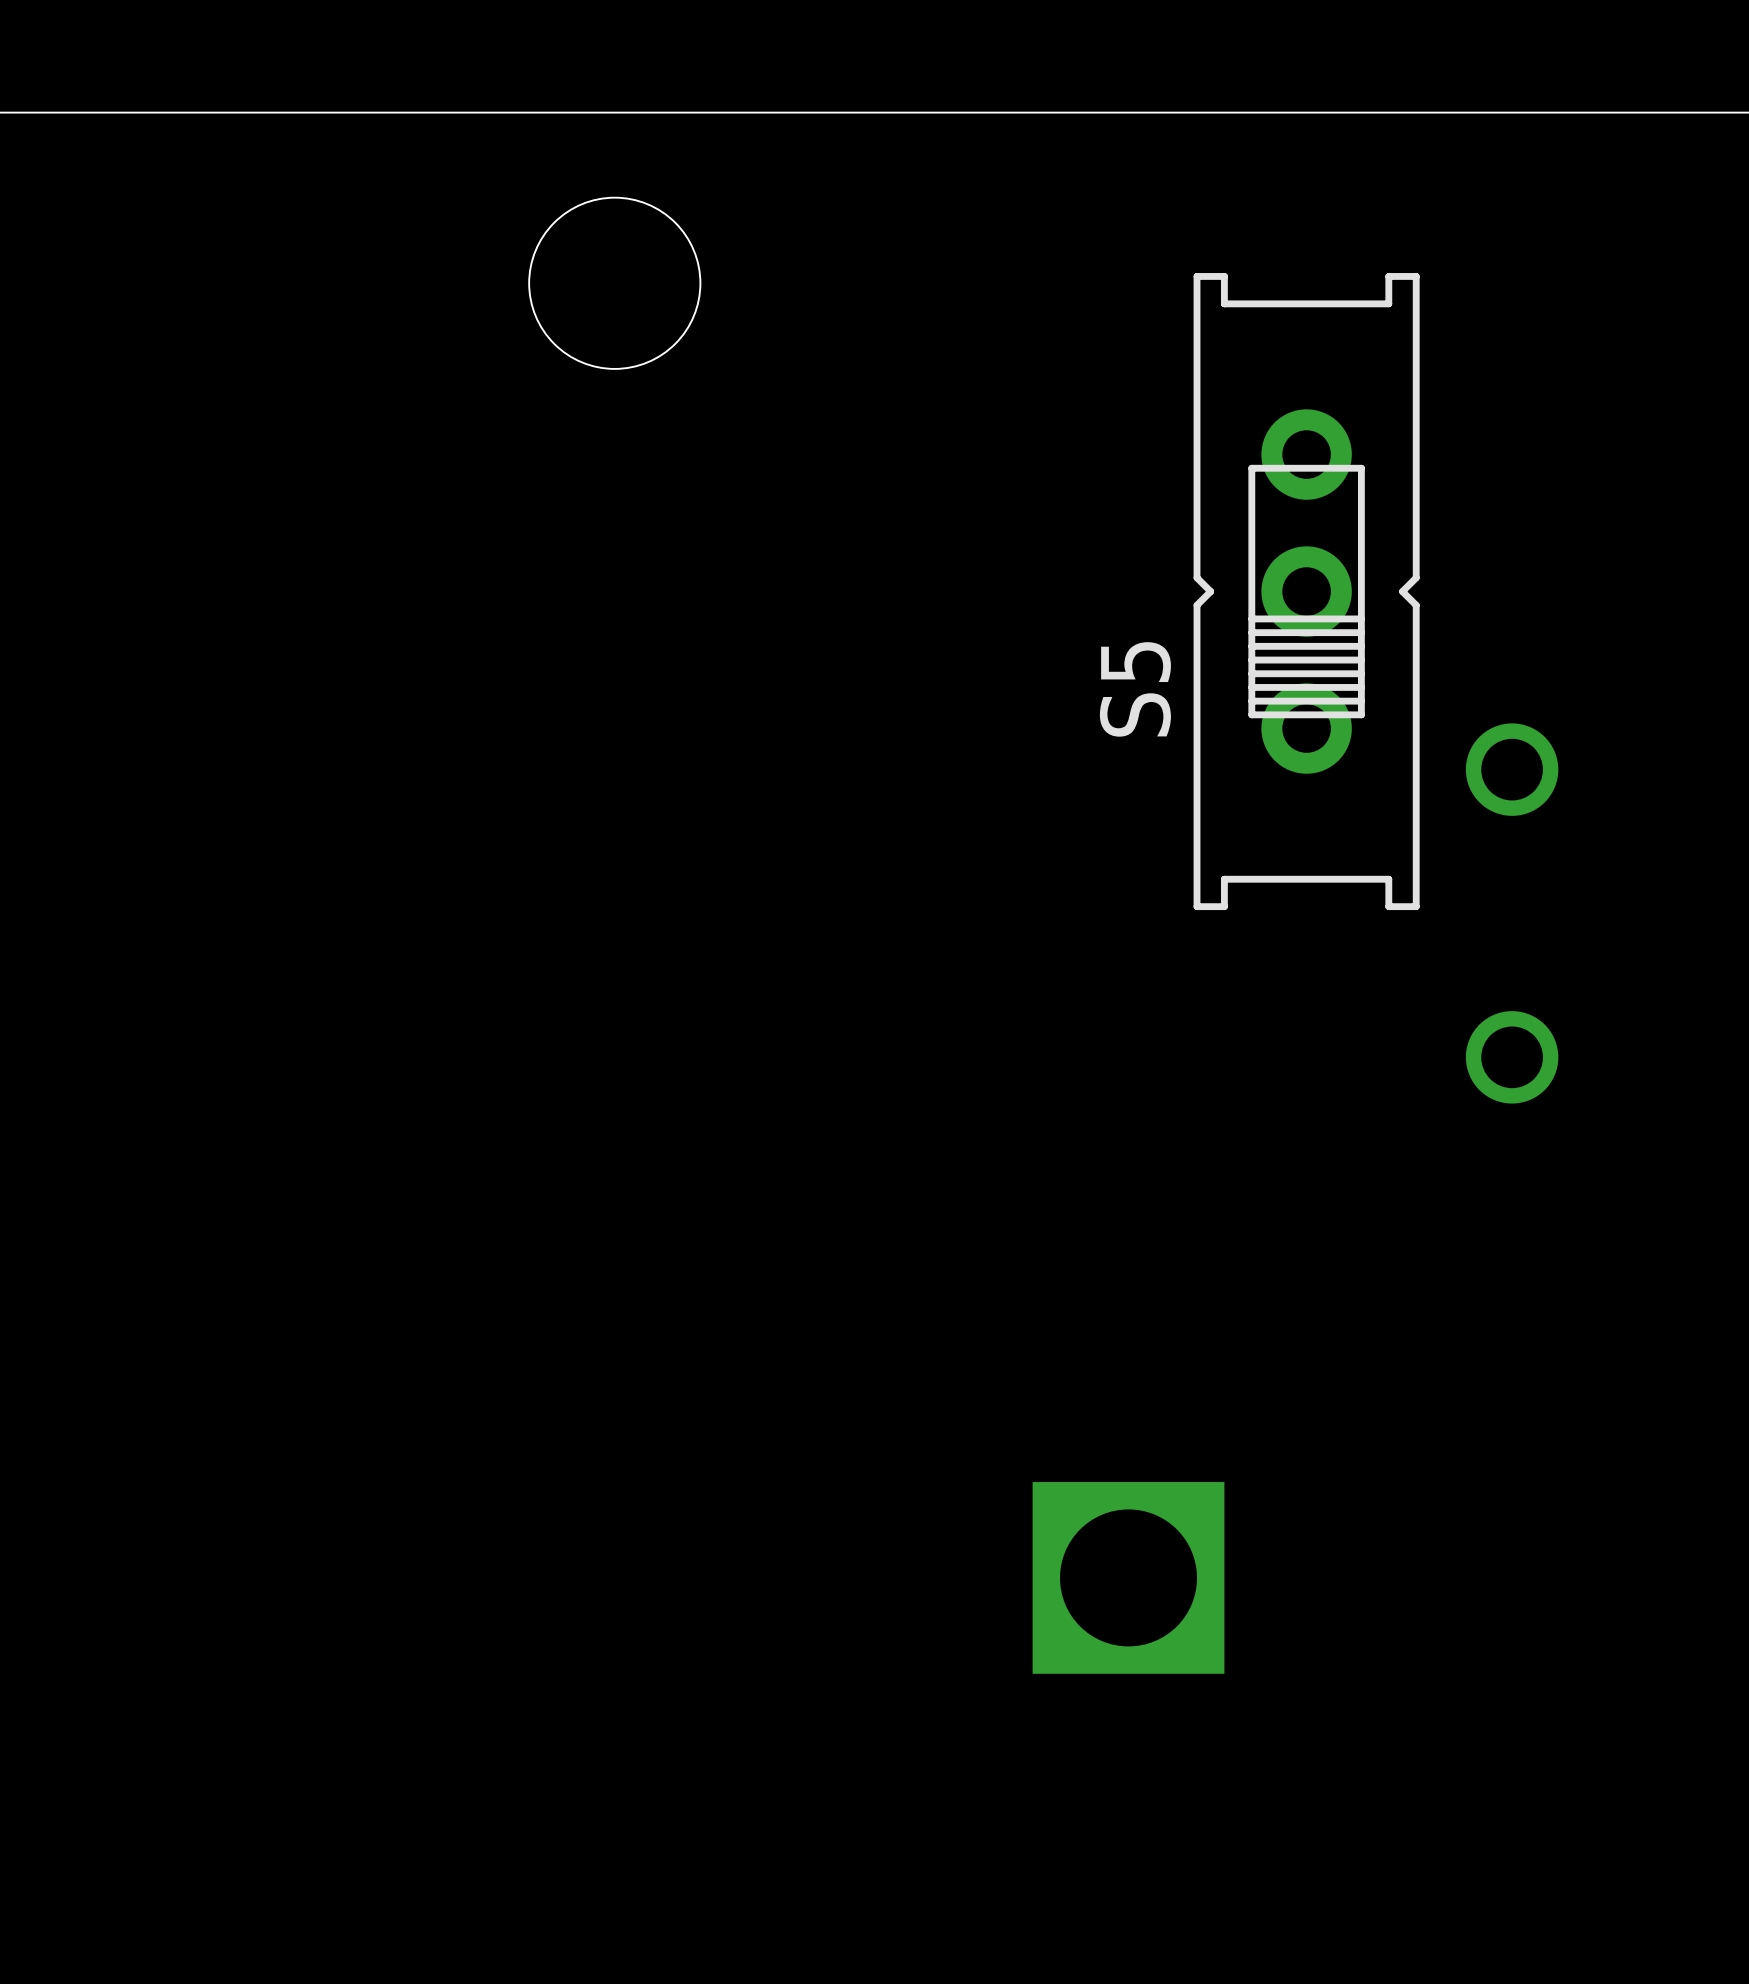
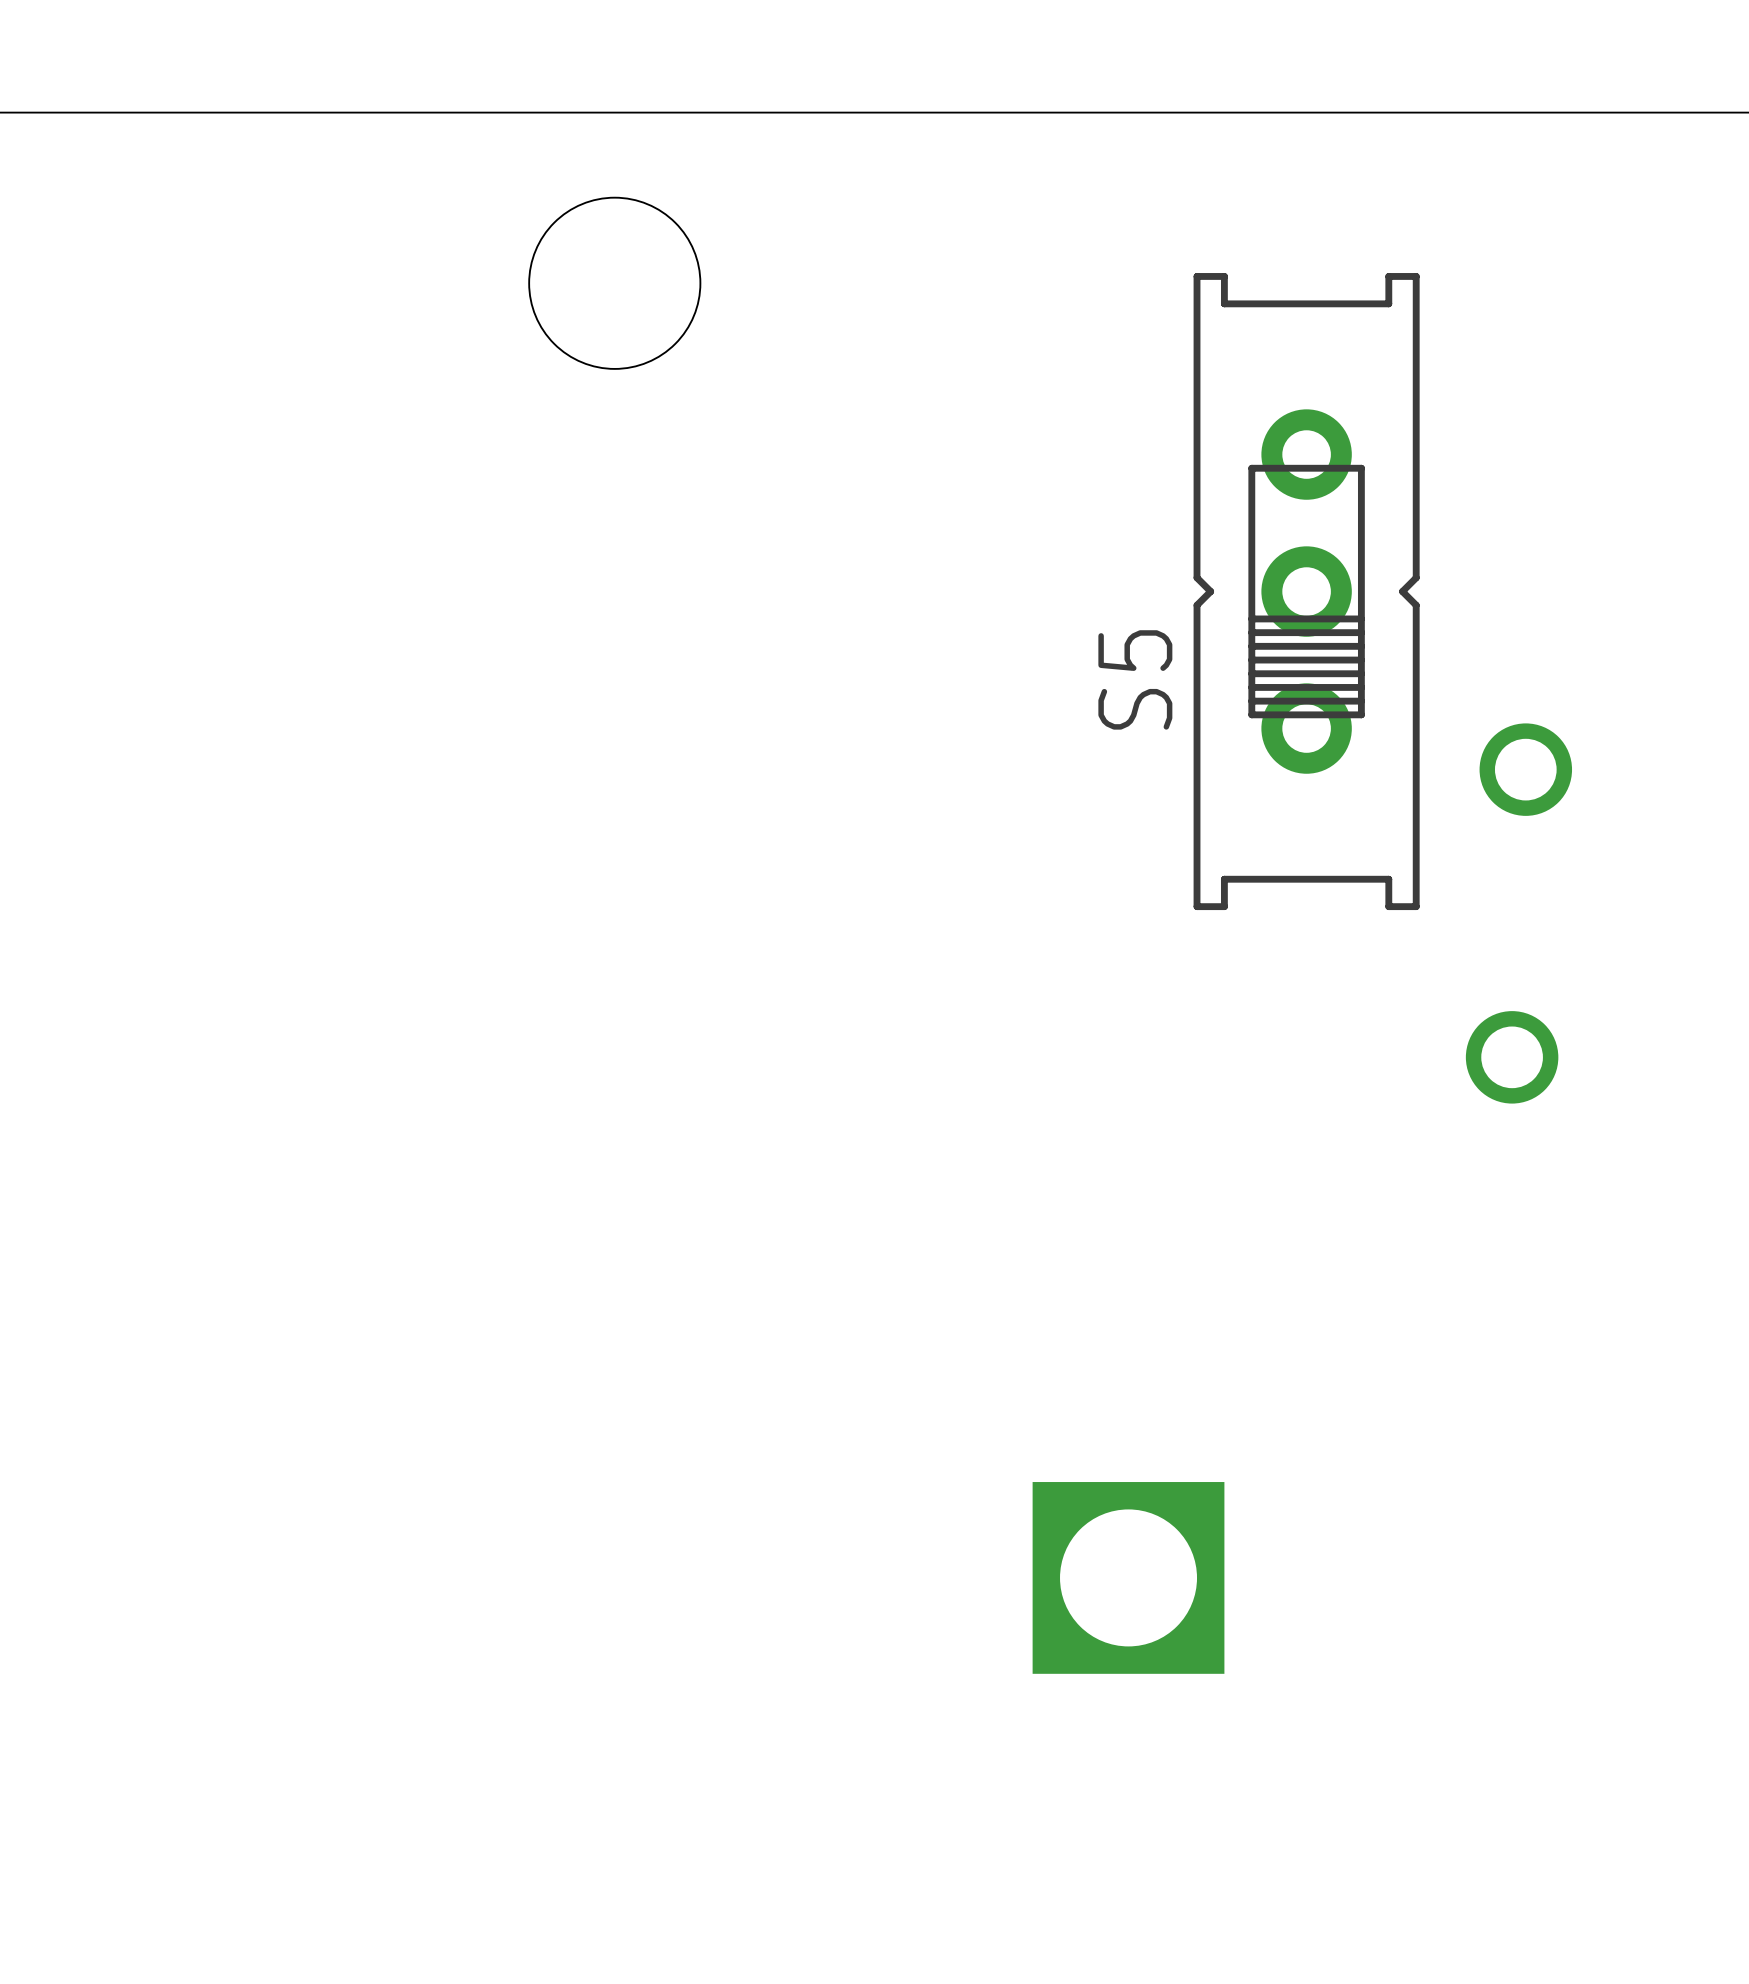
via position: (1512, 769) -> (1525, 769)

